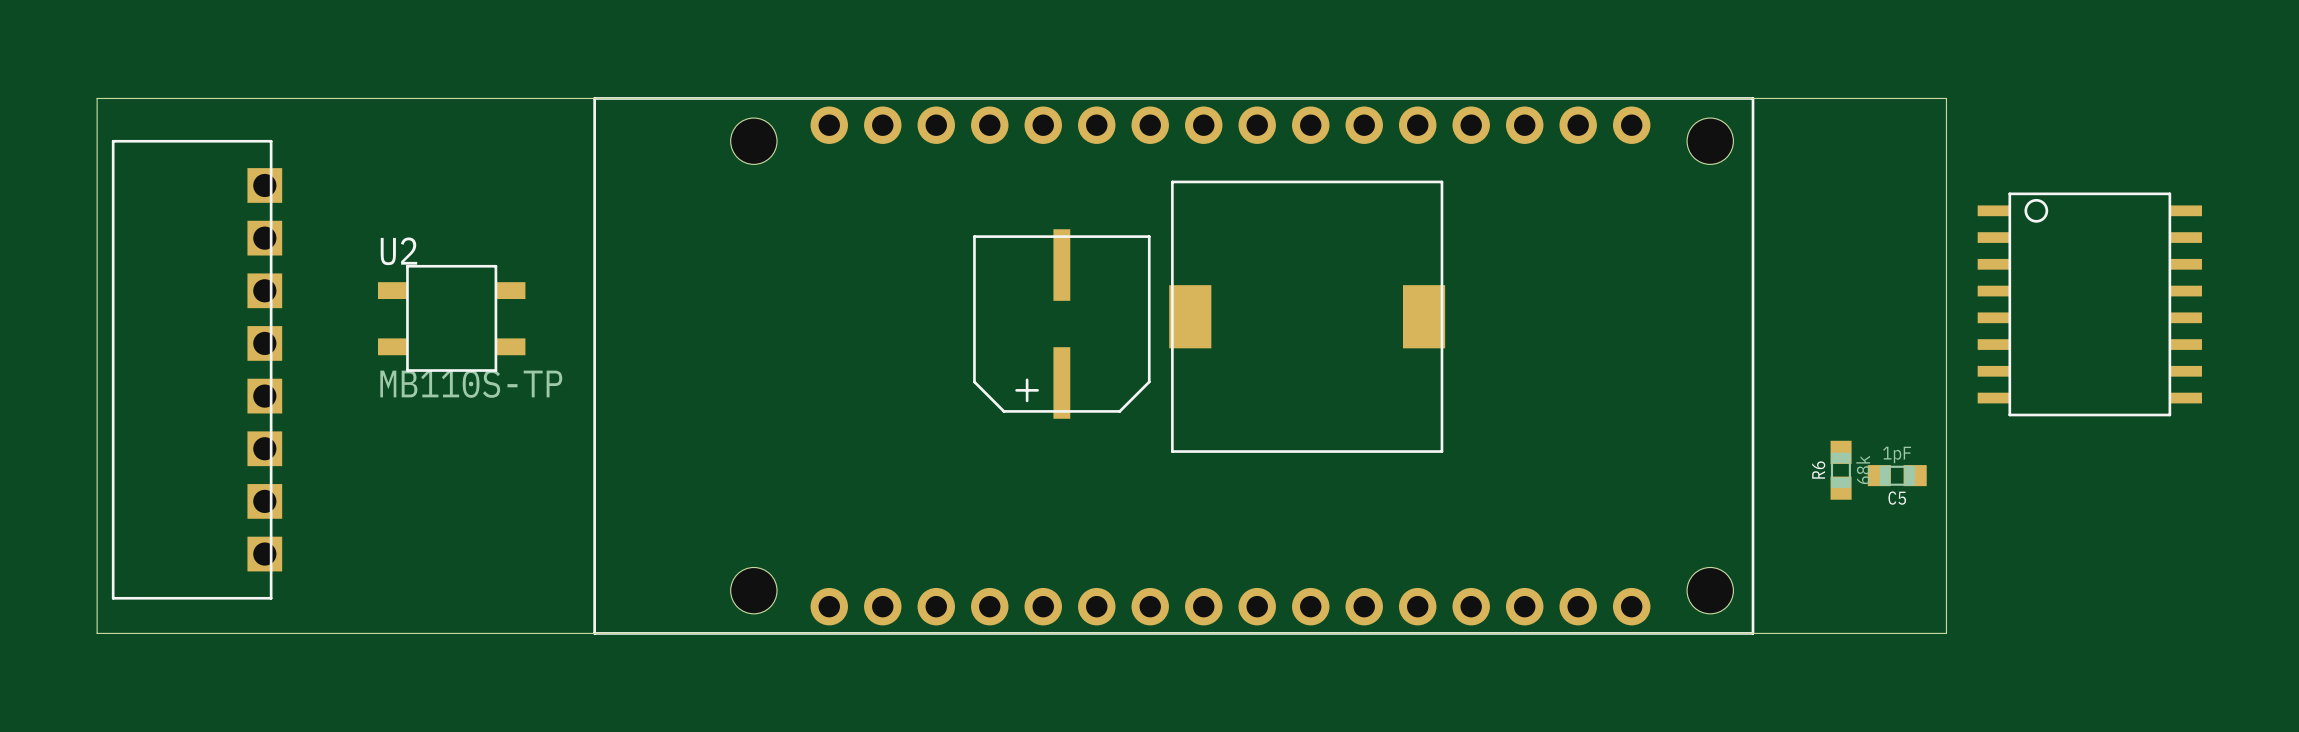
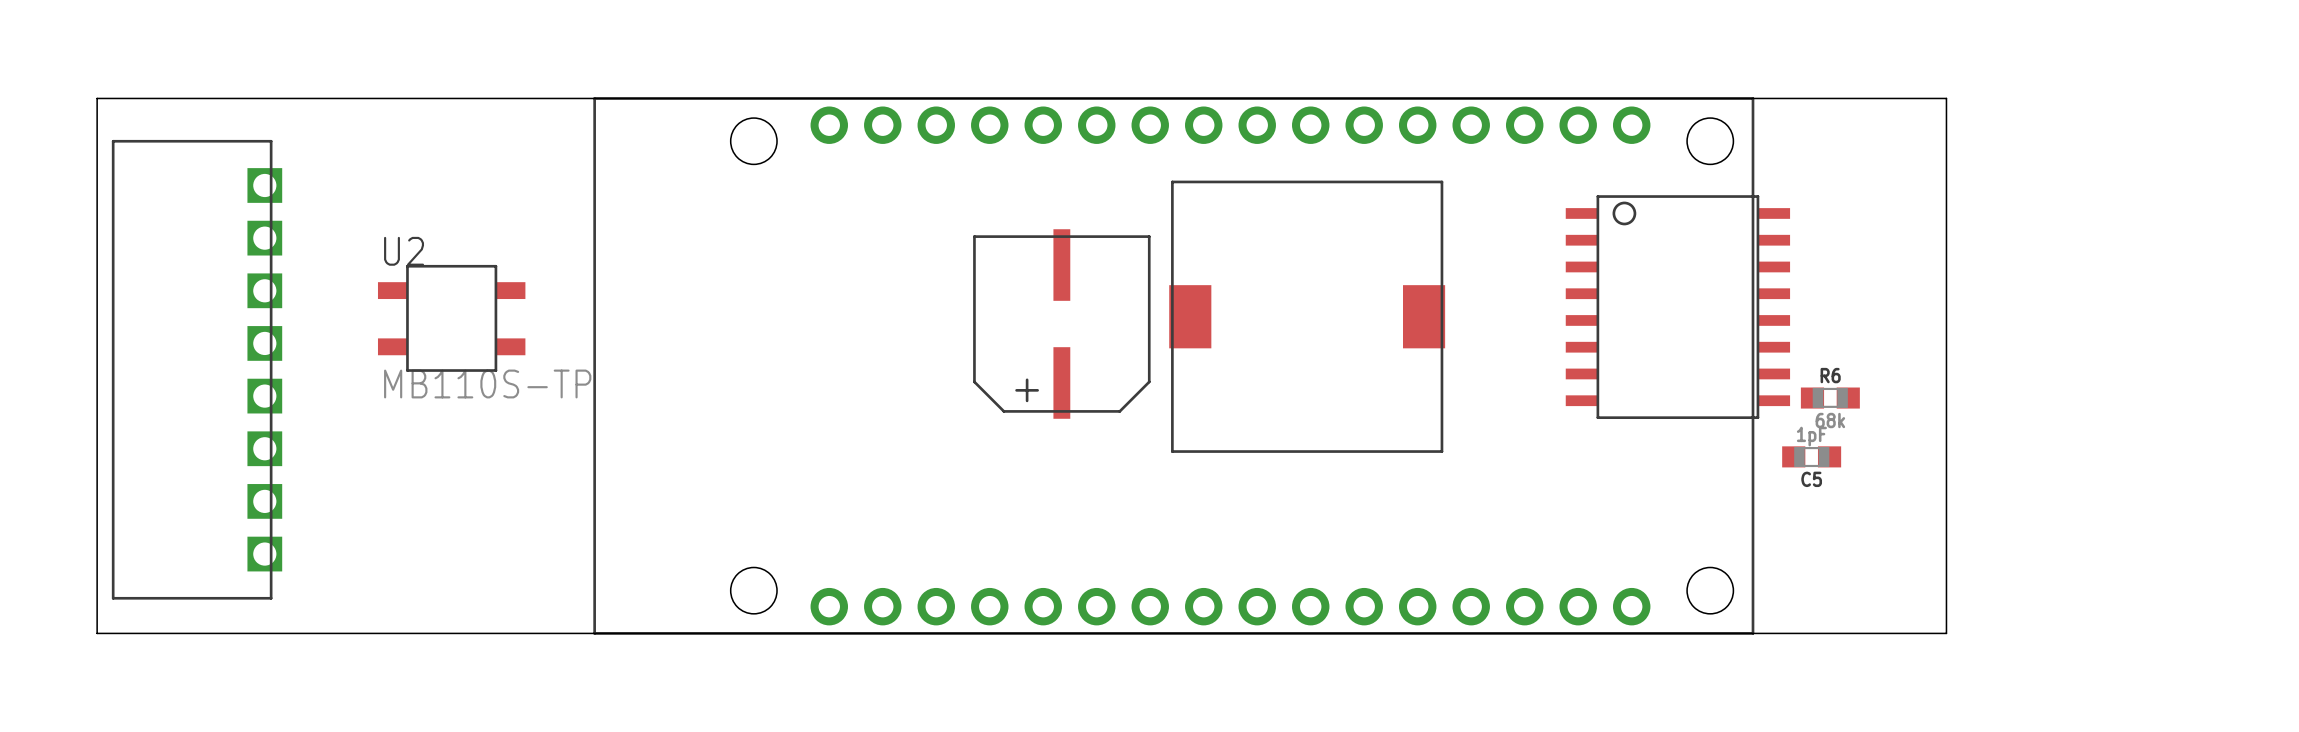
part position: (2089, 304) -> (1677, 307)
R6 rotation: 0° (1841, 470) -> 90° clockwise (1830, 398)
R6 position: (1841, 470) -> (1830, 398)
C5 position: (1897, 475) -> (1811, 456)

